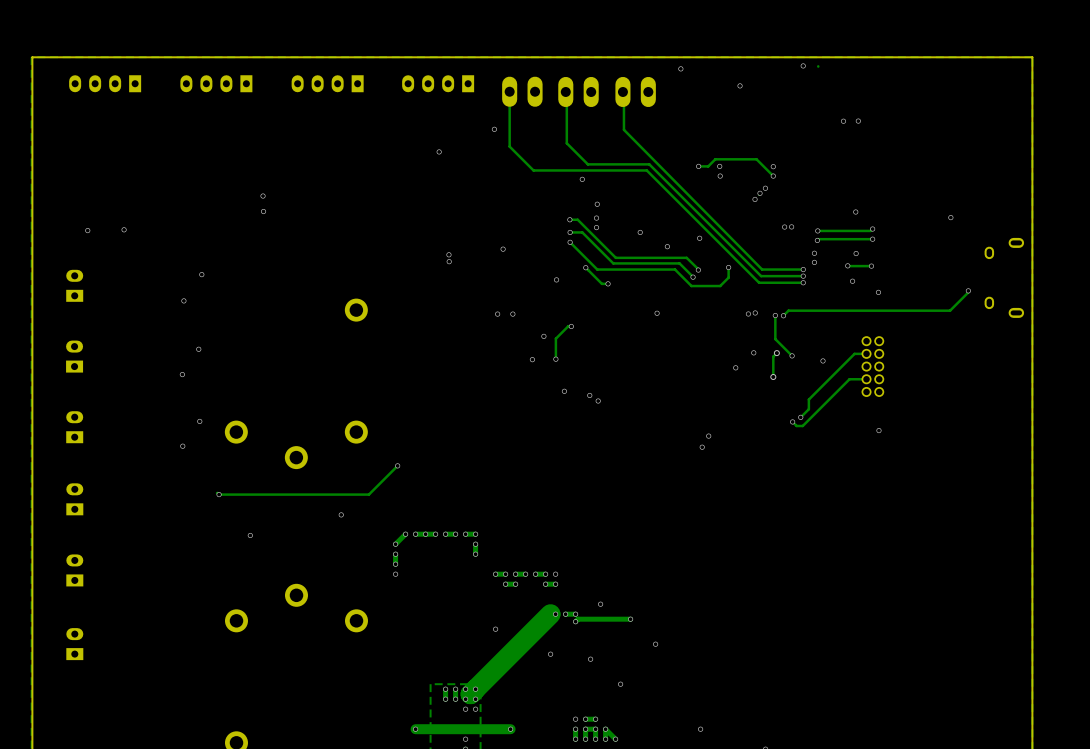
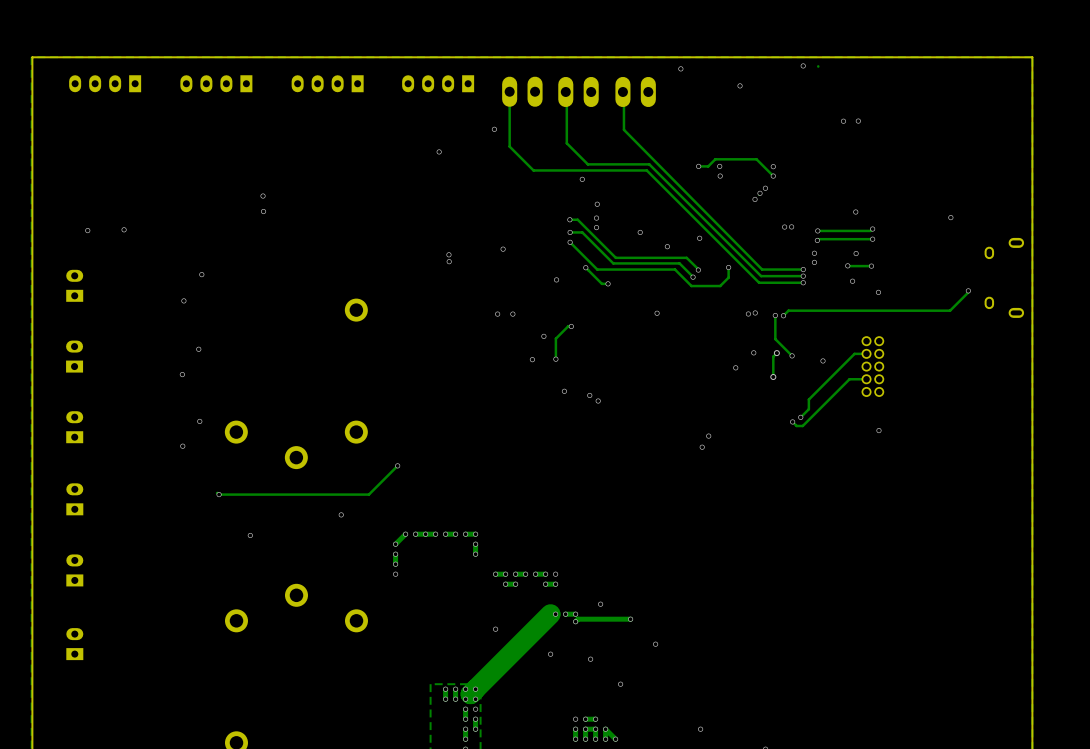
track: none -> (465, 709) (465, 719)
via: none -> (465, 719)
track: none -> (475, 719) (475, 729)
via: none -> (475, 719)
via: (415, 729) -> none
track: none -> (465, 729) (465, 739)
via: none -> (465, 729)
via: none -> (475, 729)
track: (510, 729) (415, 729) -> none
via: (510, 729) -> none

